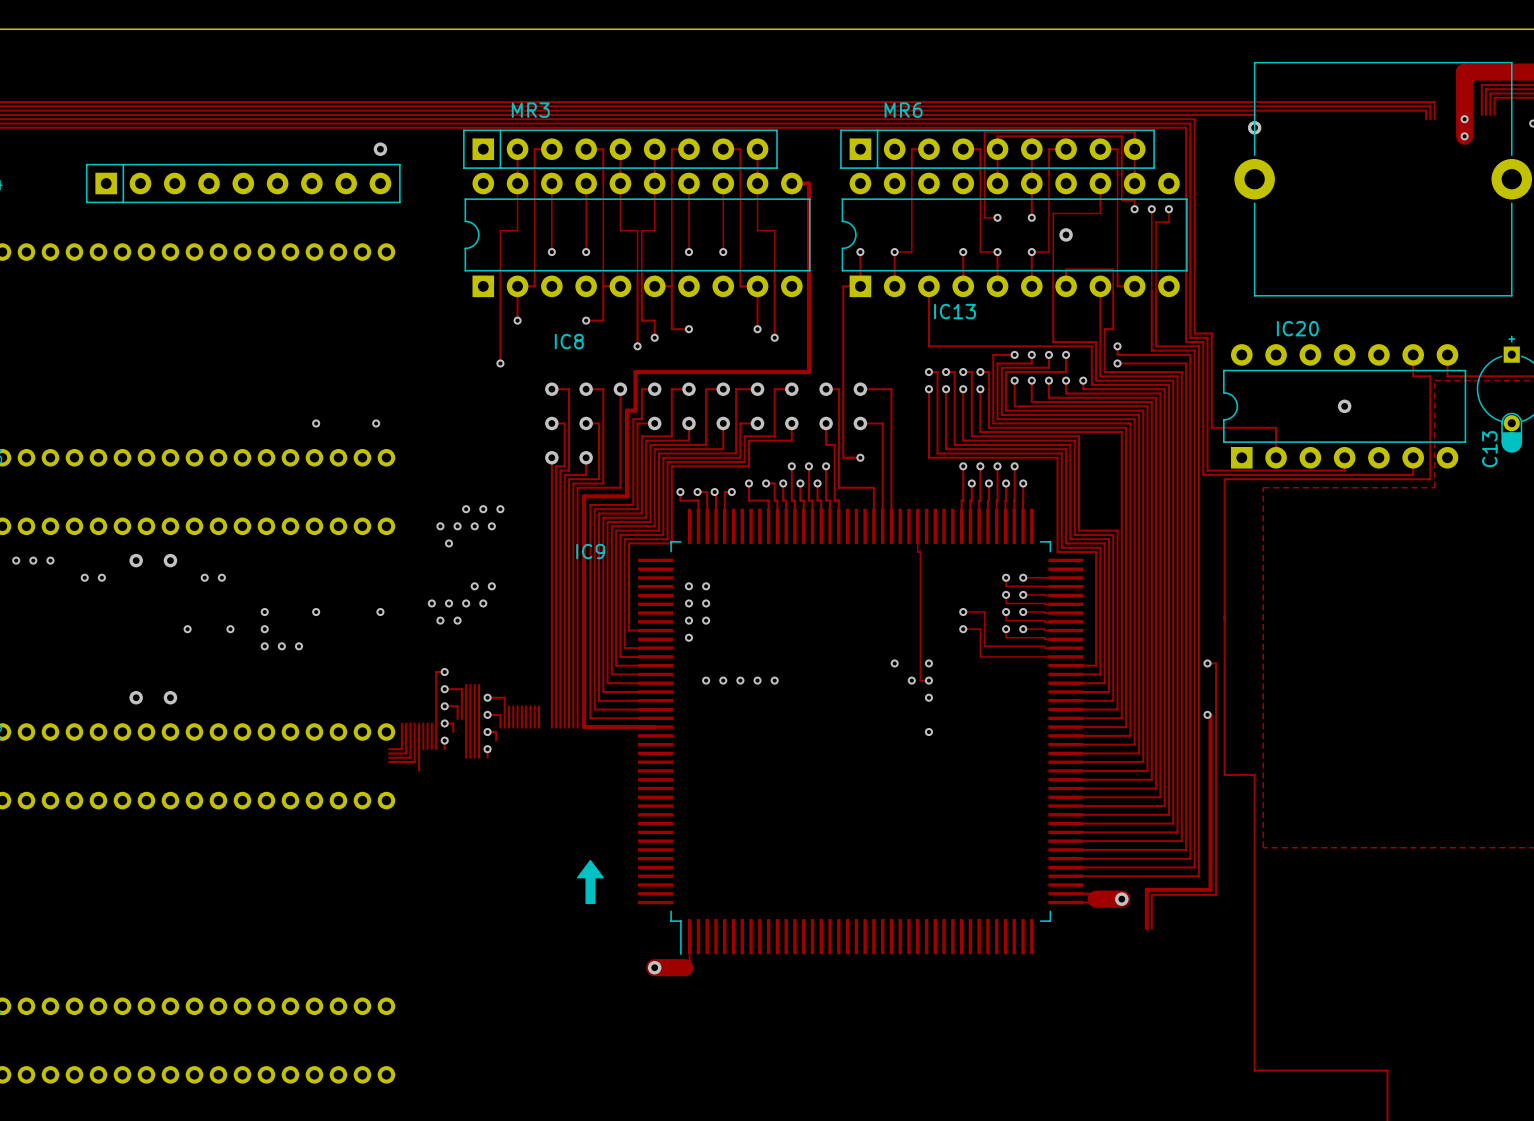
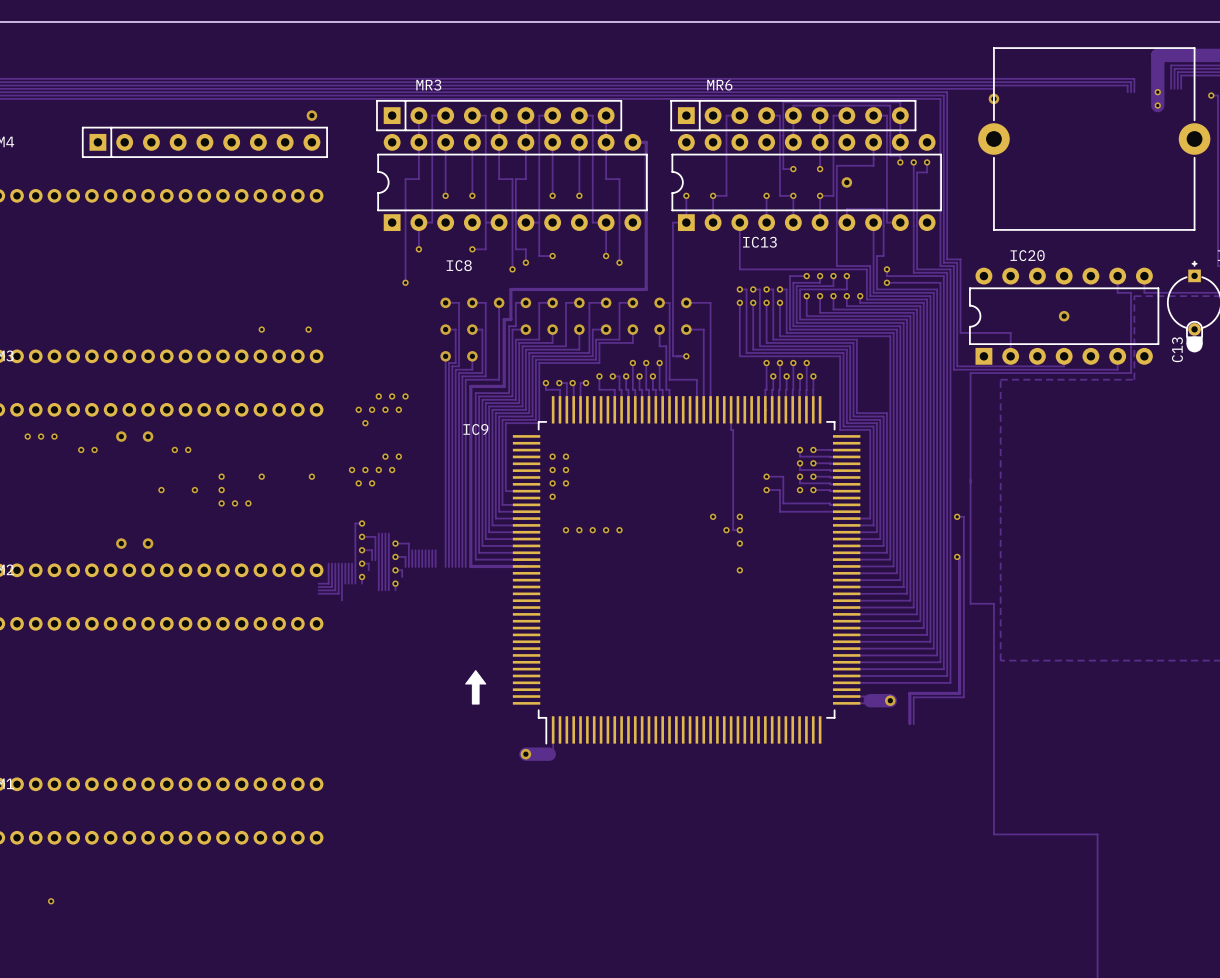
track: (1006, 629) (1006, 637) (1065, 639) -> none

